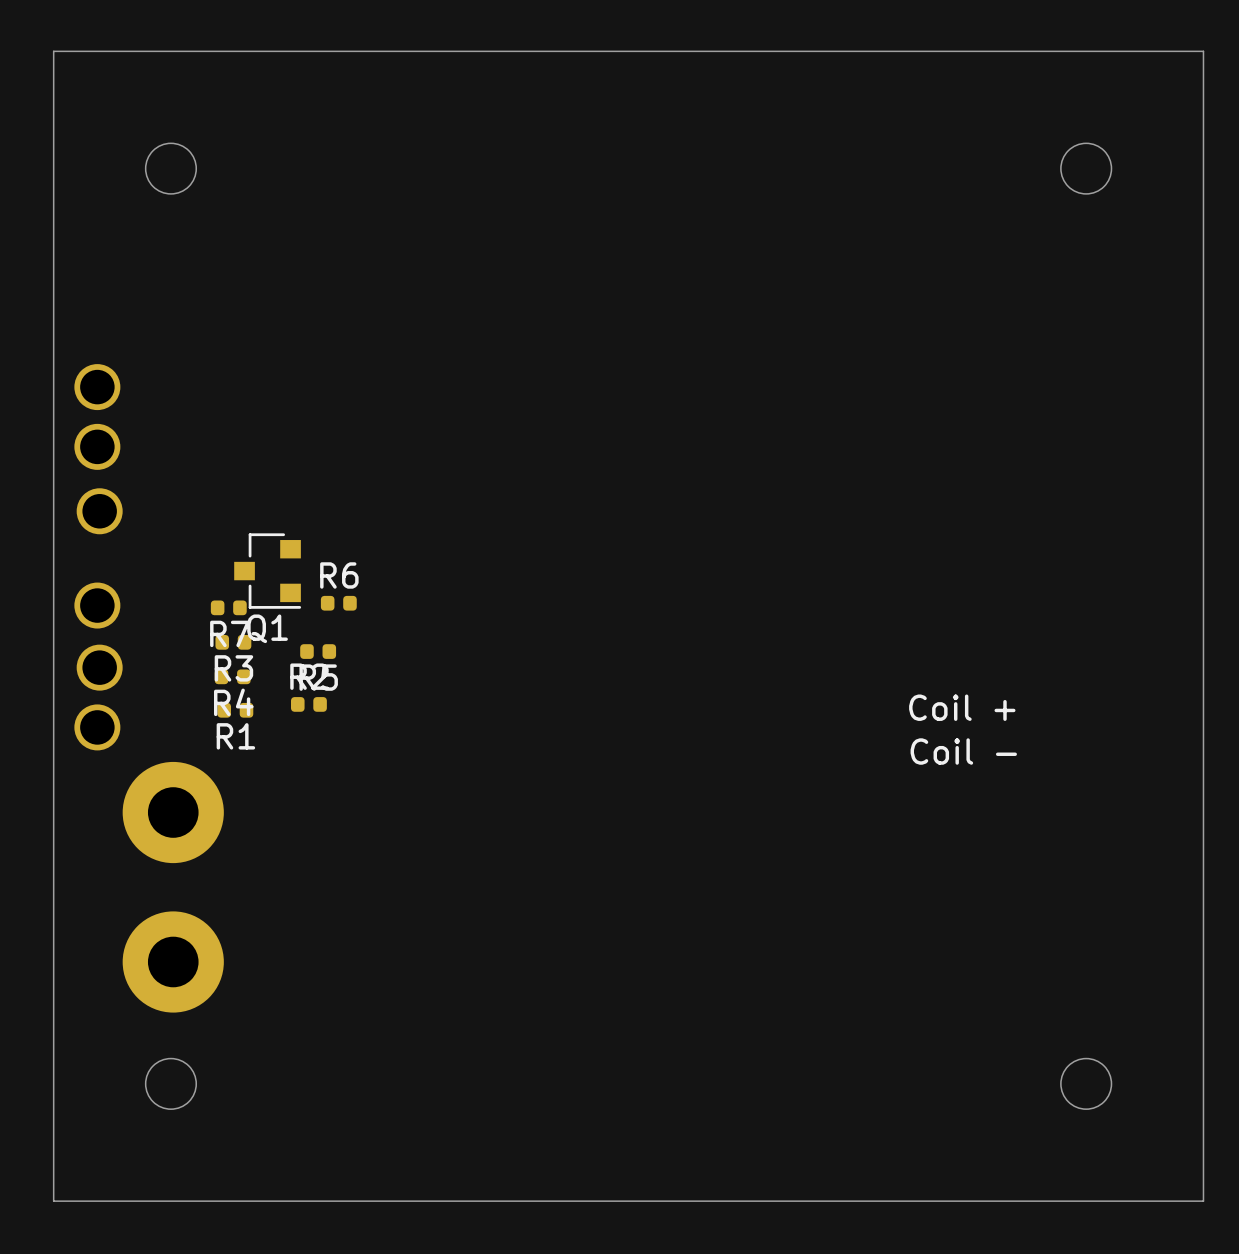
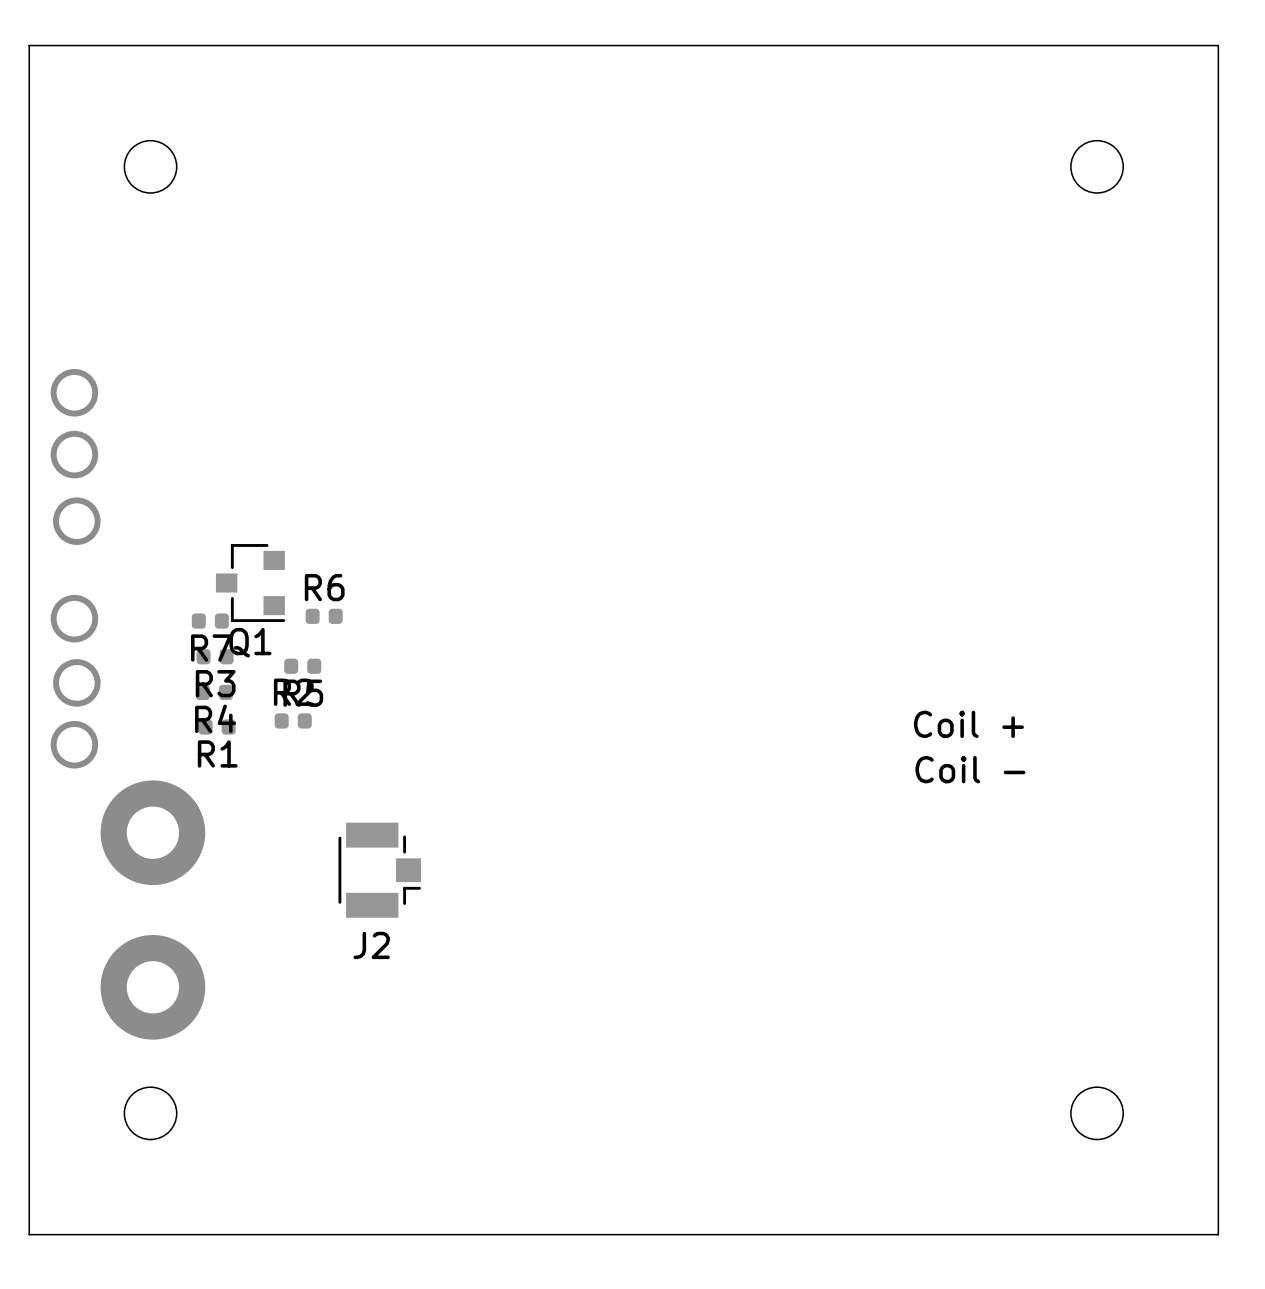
J2: none -> (379, 870)

